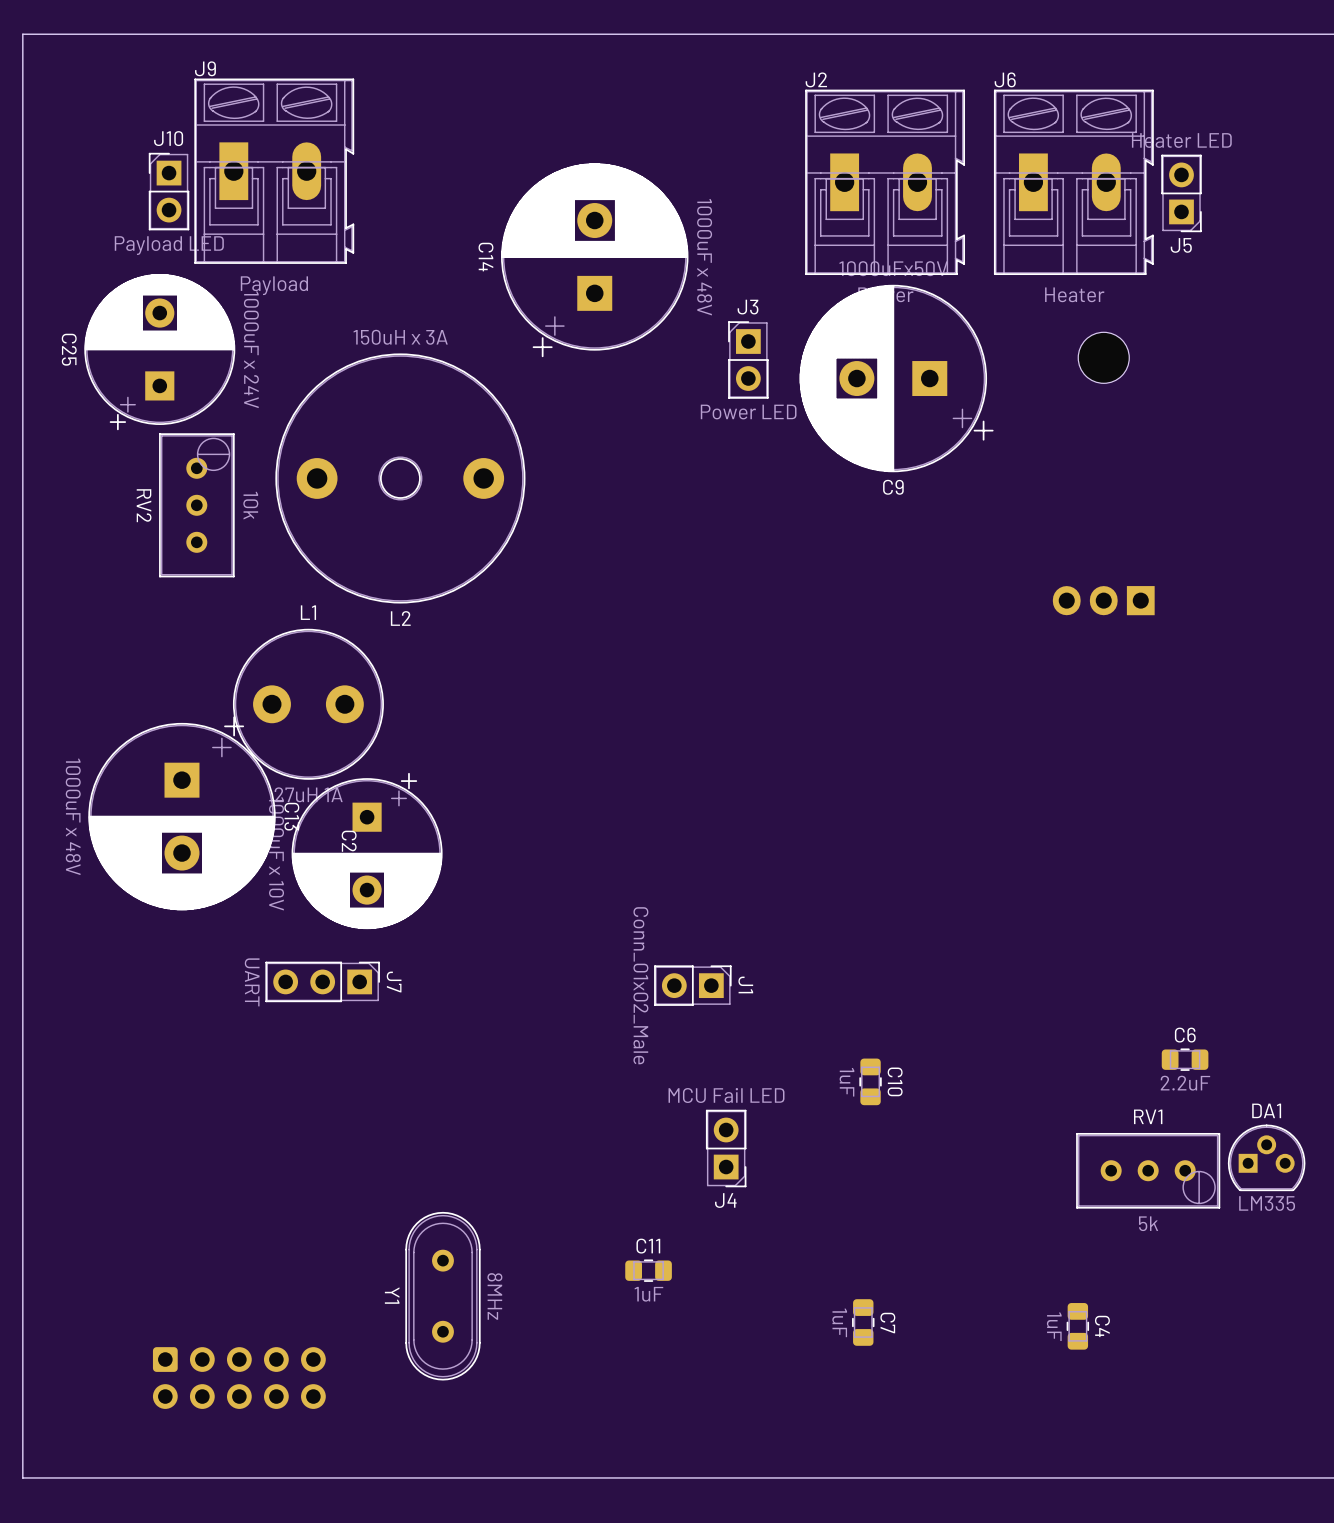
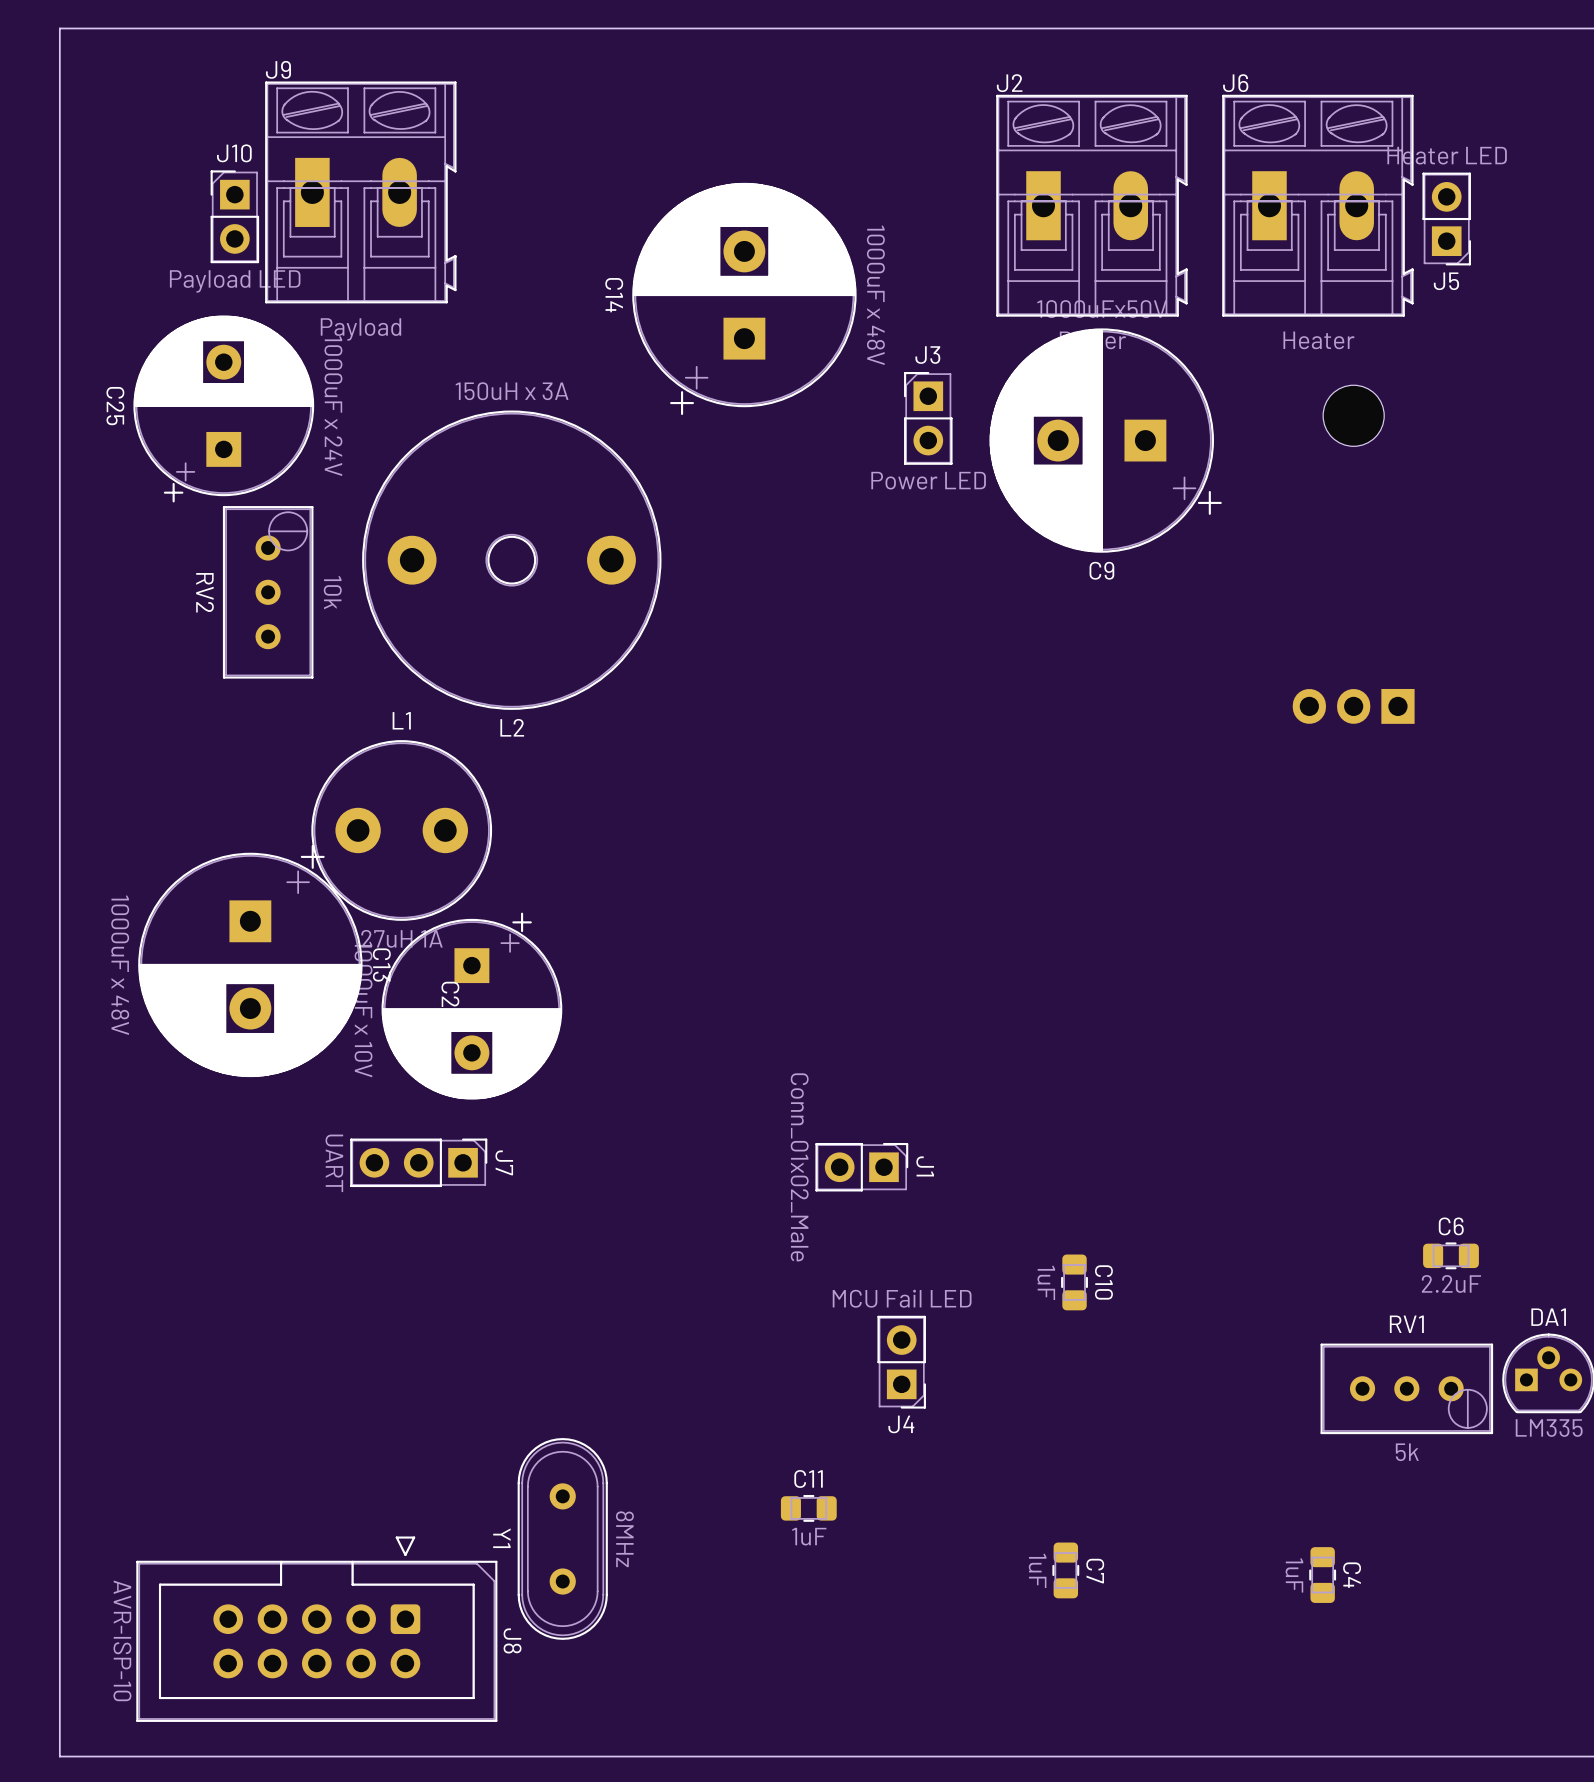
J8 side: top (239, 1378) -> bottom (316, 1629)

